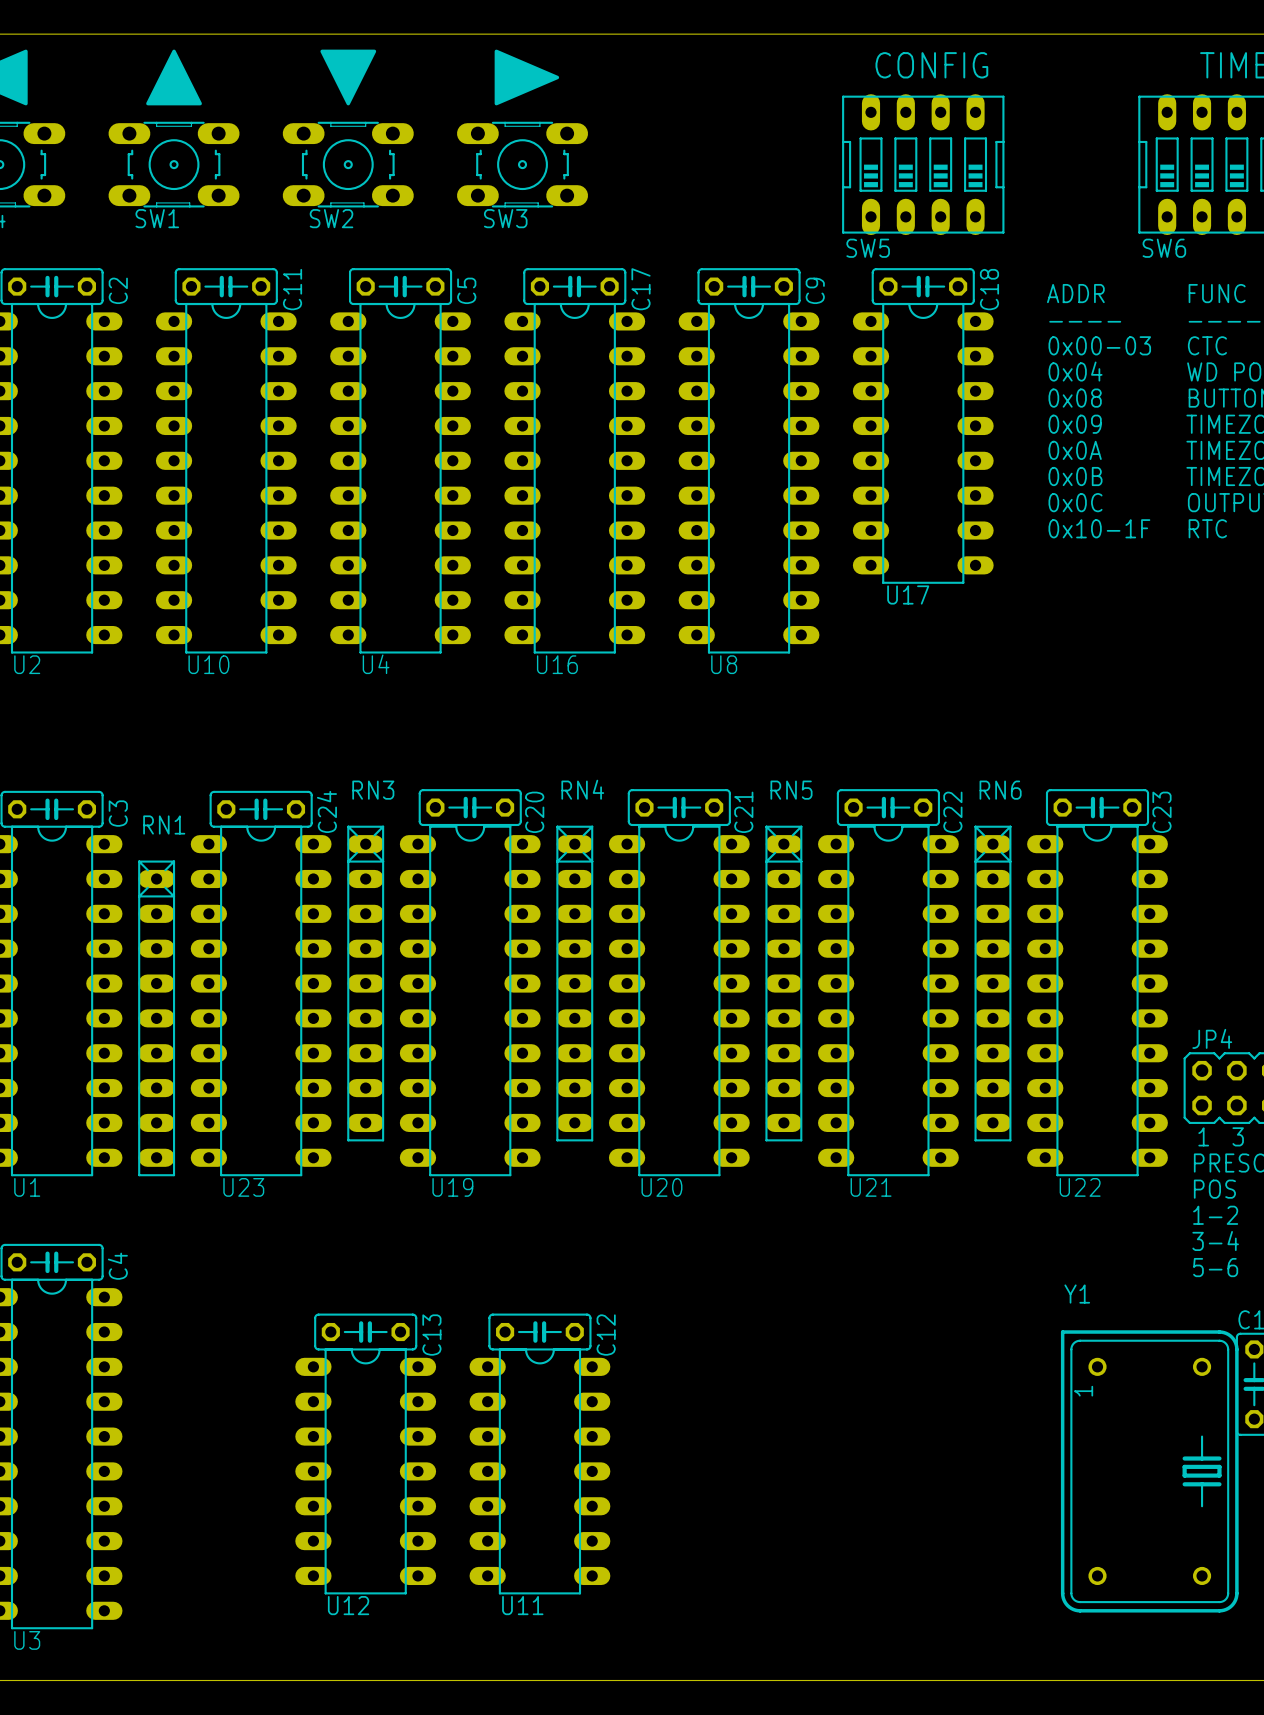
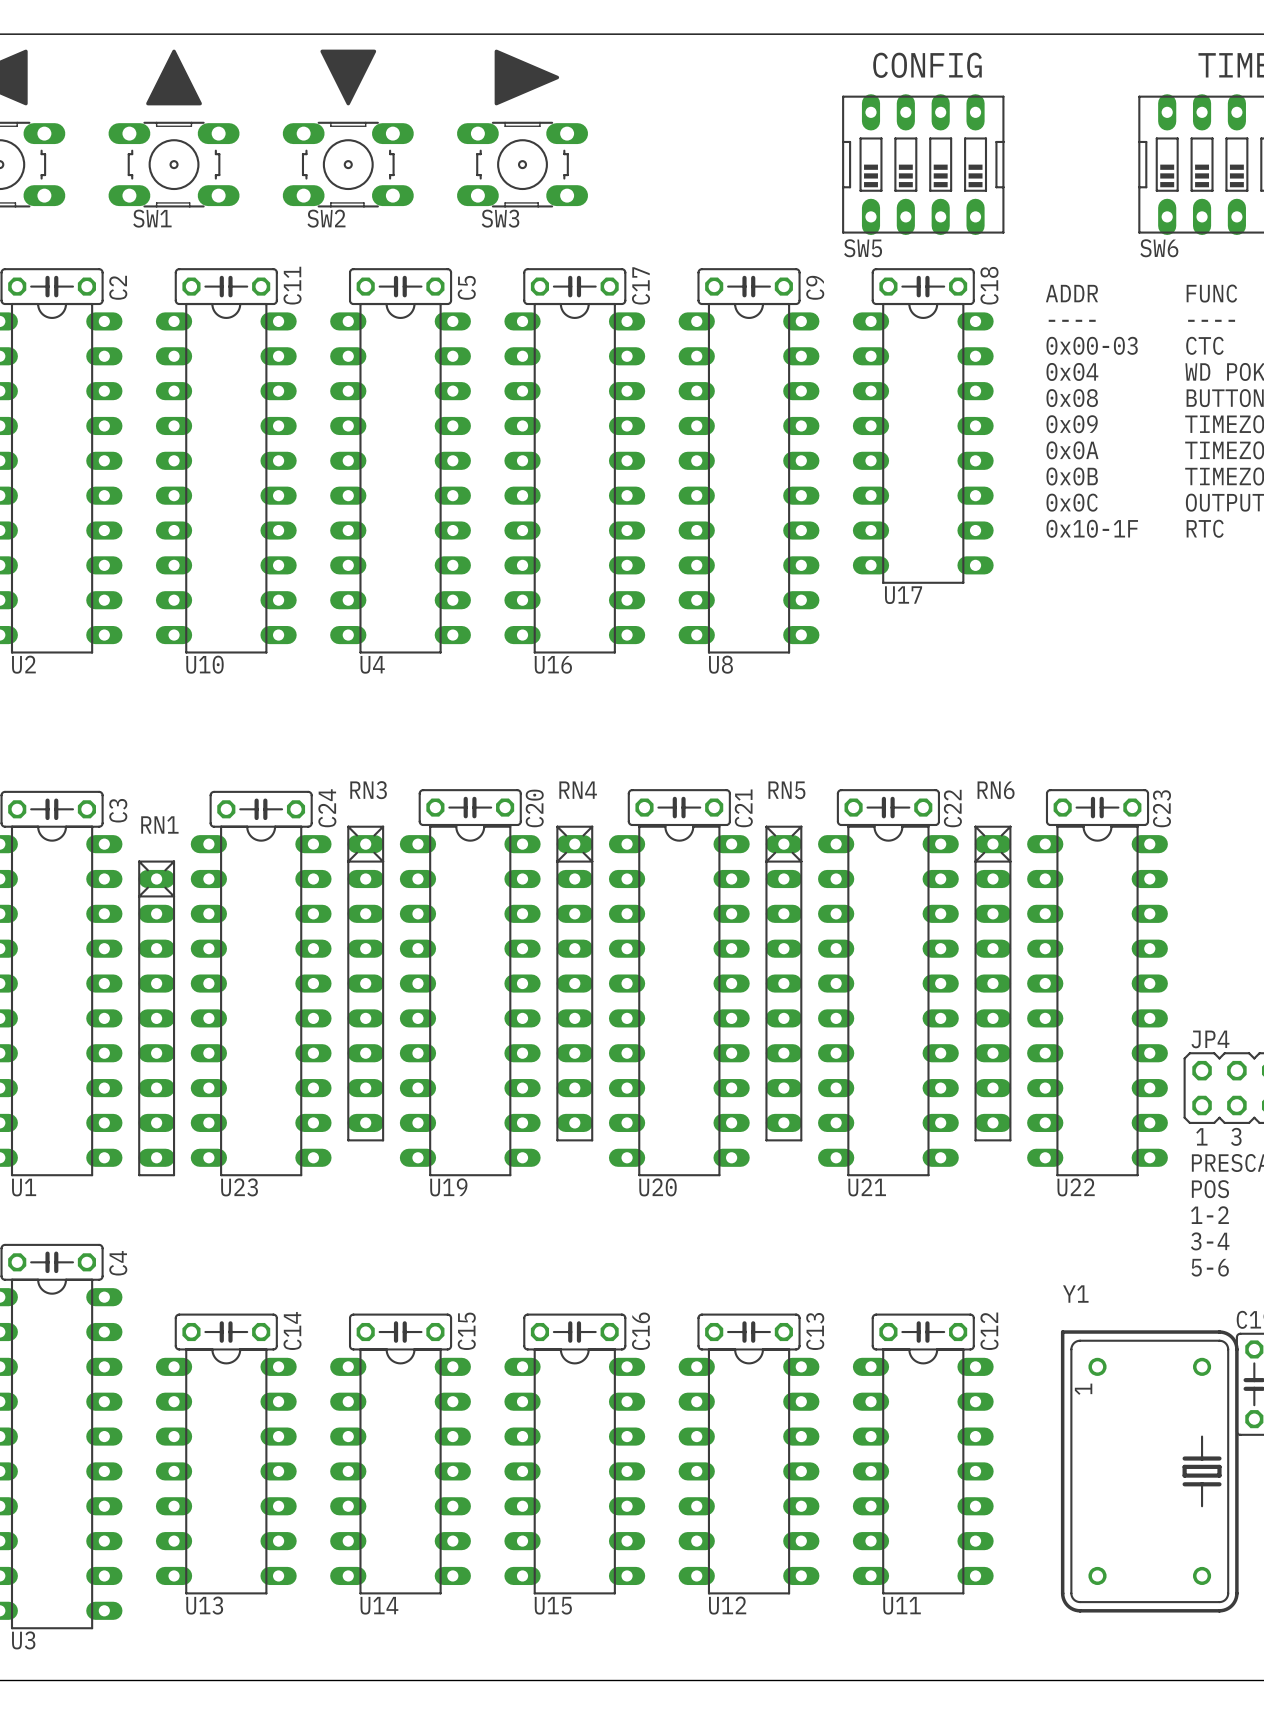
C14: none -> (226, 1332)
C13 position: (365, 1332) -> (749, 1332)
C15: none -> (400, 1332)
C12 position: (539, 1332) -> (923, 1332)
C16: none -> (574, 1332)
U13: none -> (226, 1471)
U12 position: (365, 1471) -> (749, 1471)
U14: none -> (400, 1471)
U11 position: (539, 1471) -> (923, 1471)
U15: none -> (574, 1471)

